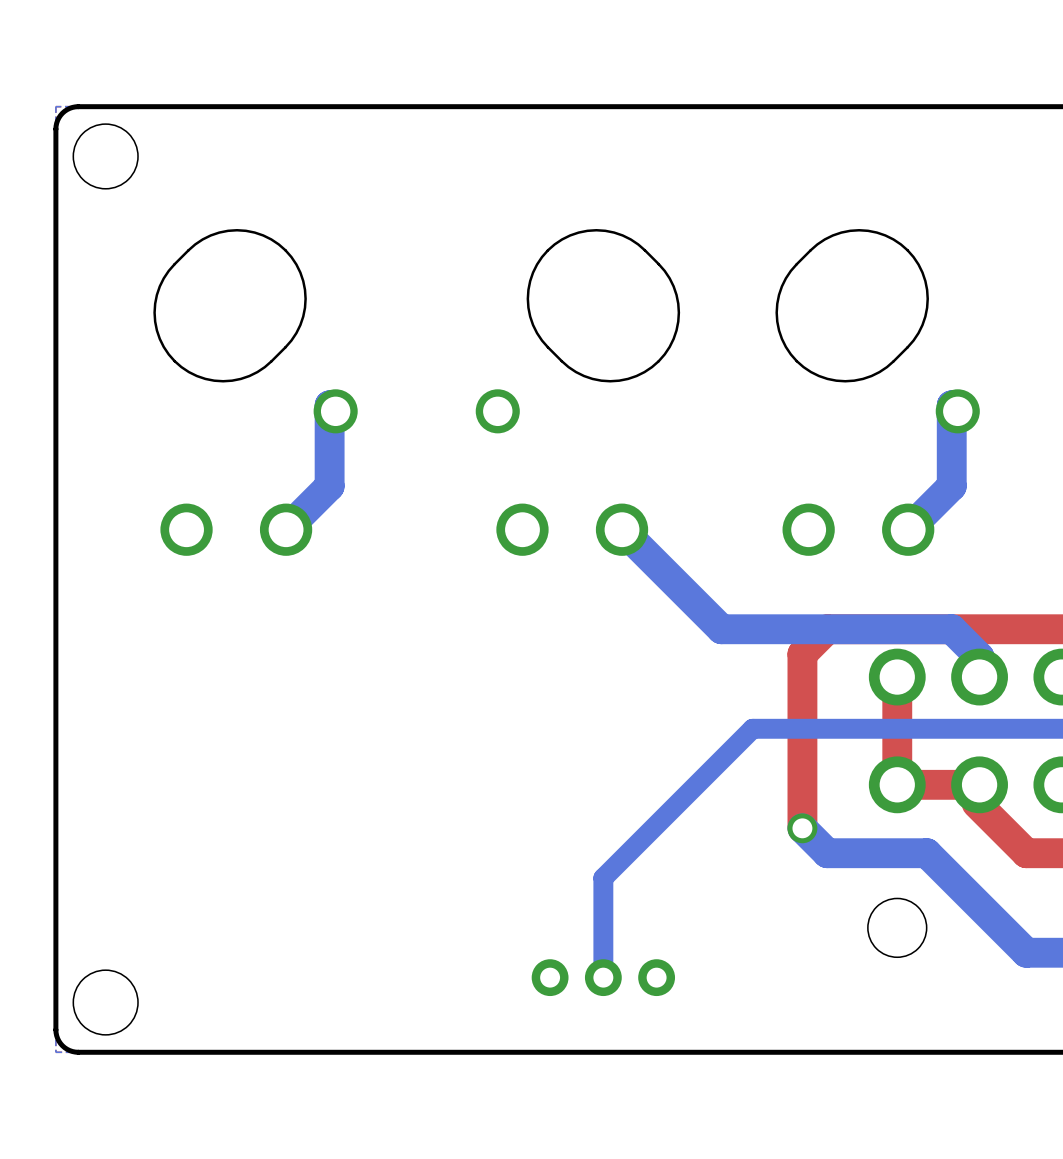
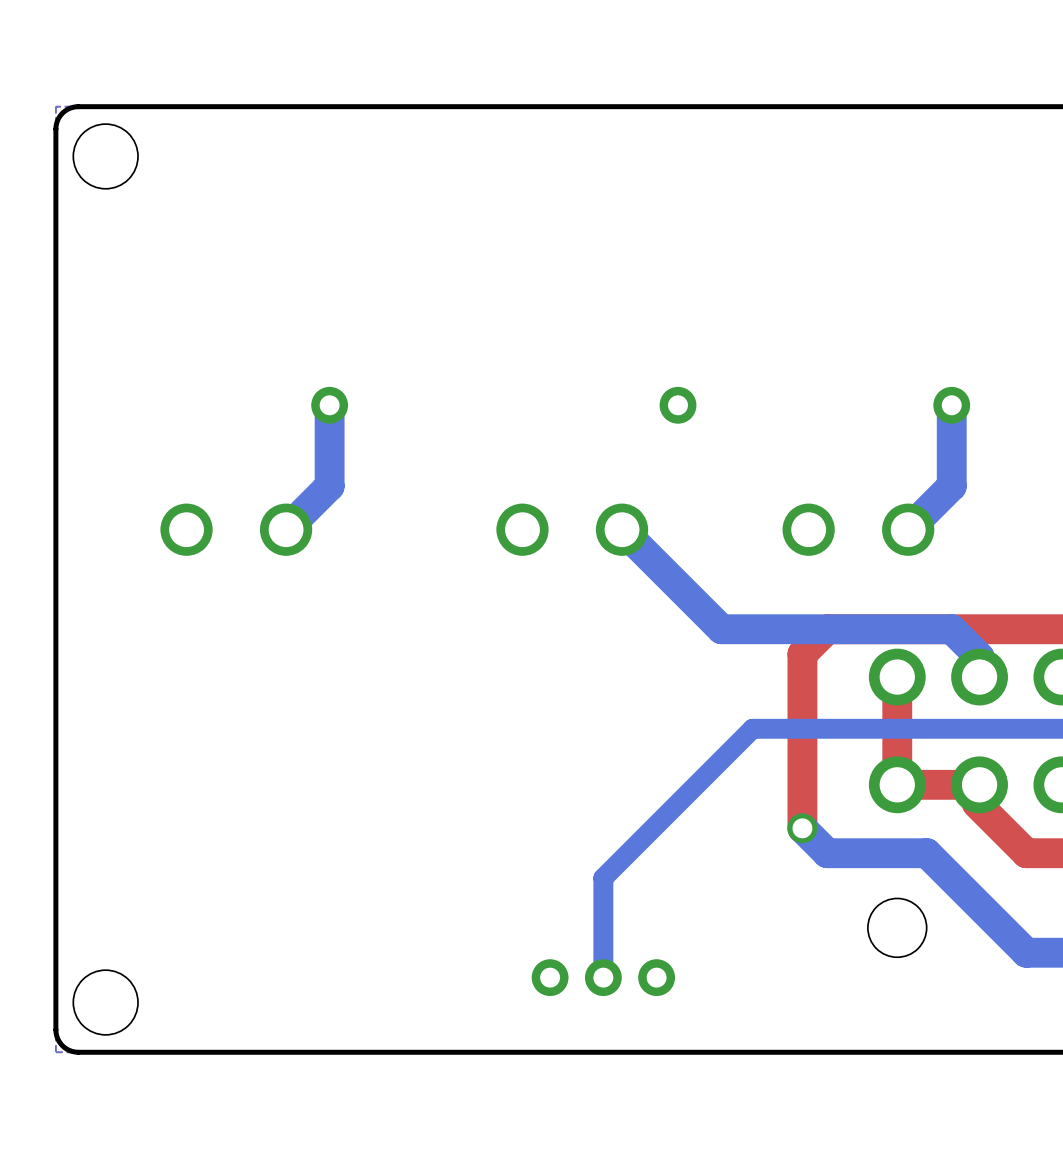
part: (255, 331) -> none
part: (577, 331) -> none
part: (877, 331) -> none
via: none -> (329, 405)
via: none -> (678, 405)
via: none -> (951, 405)

